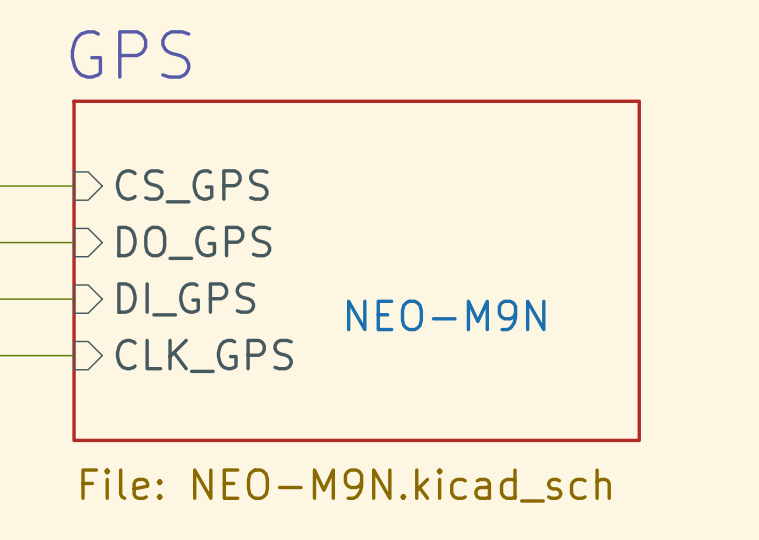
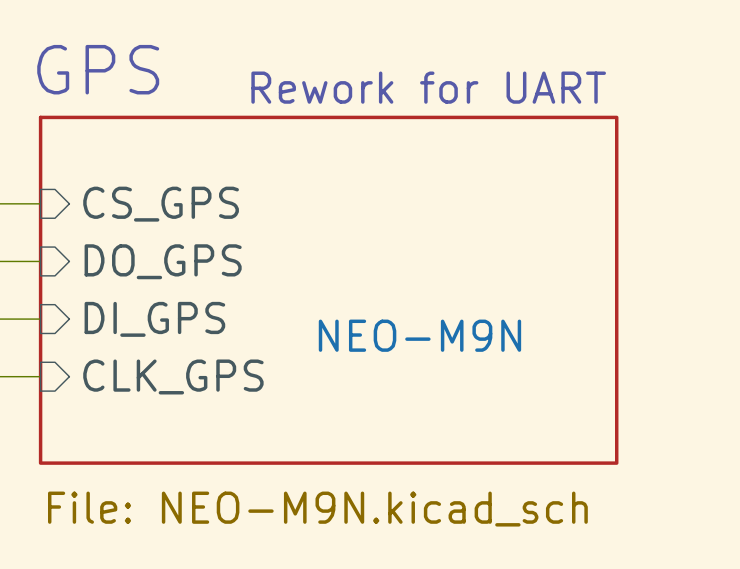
text: none -> Rework for UART (428, 87)

